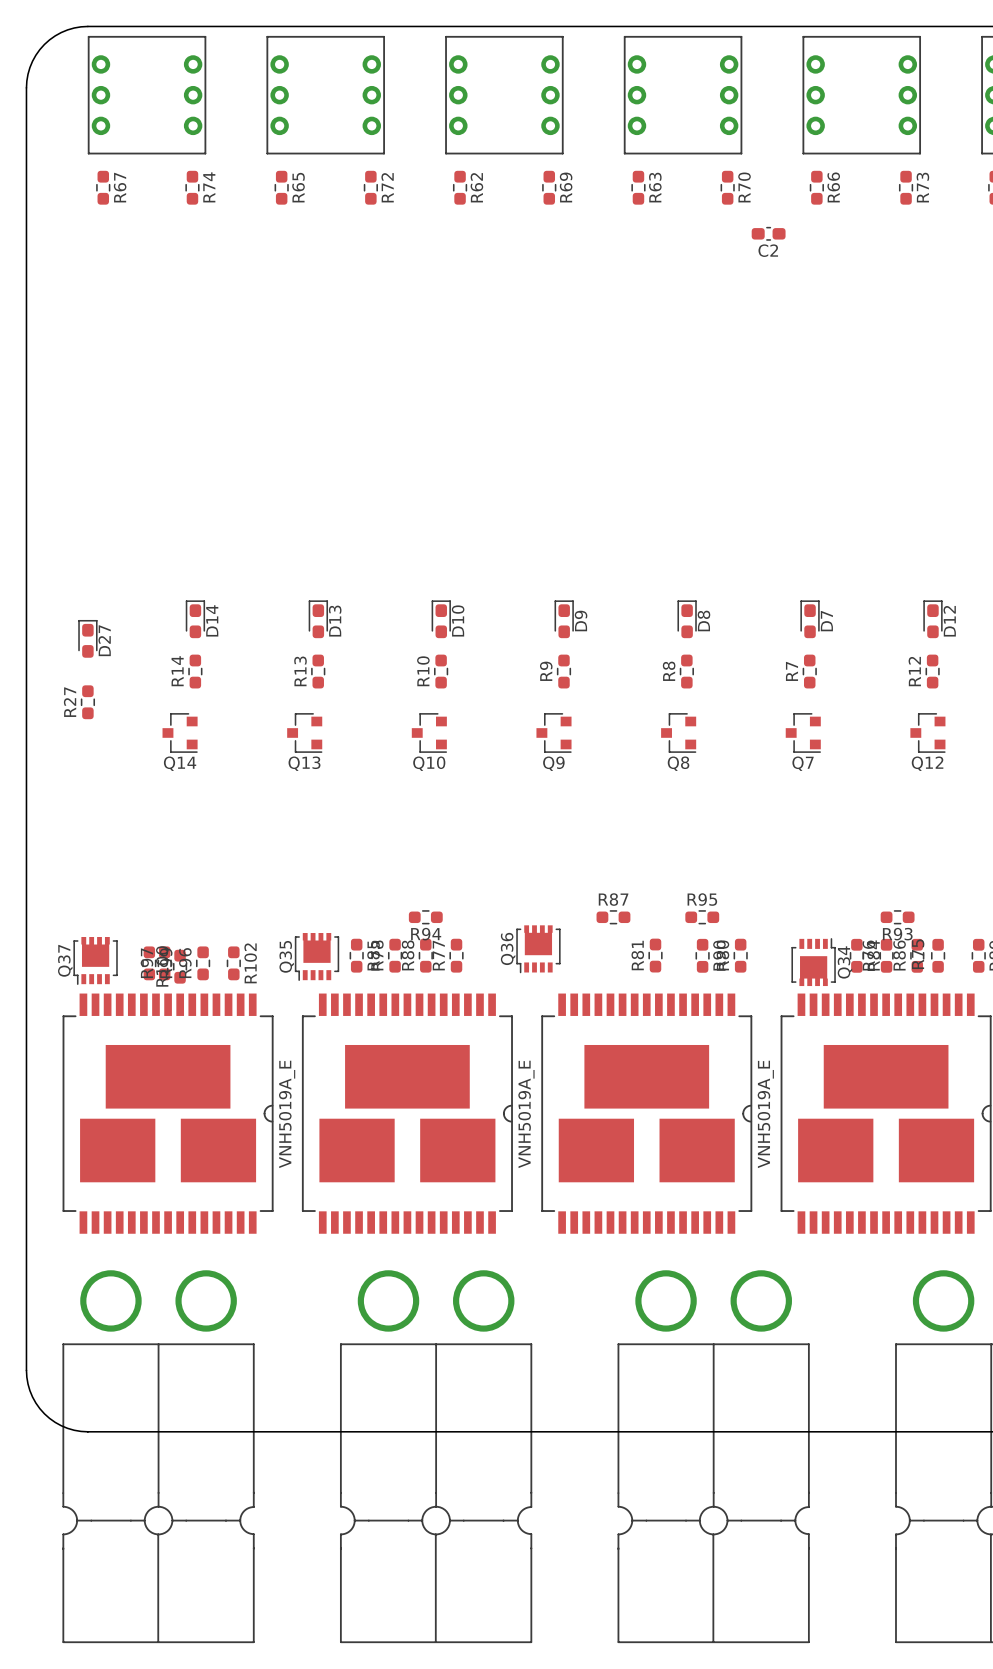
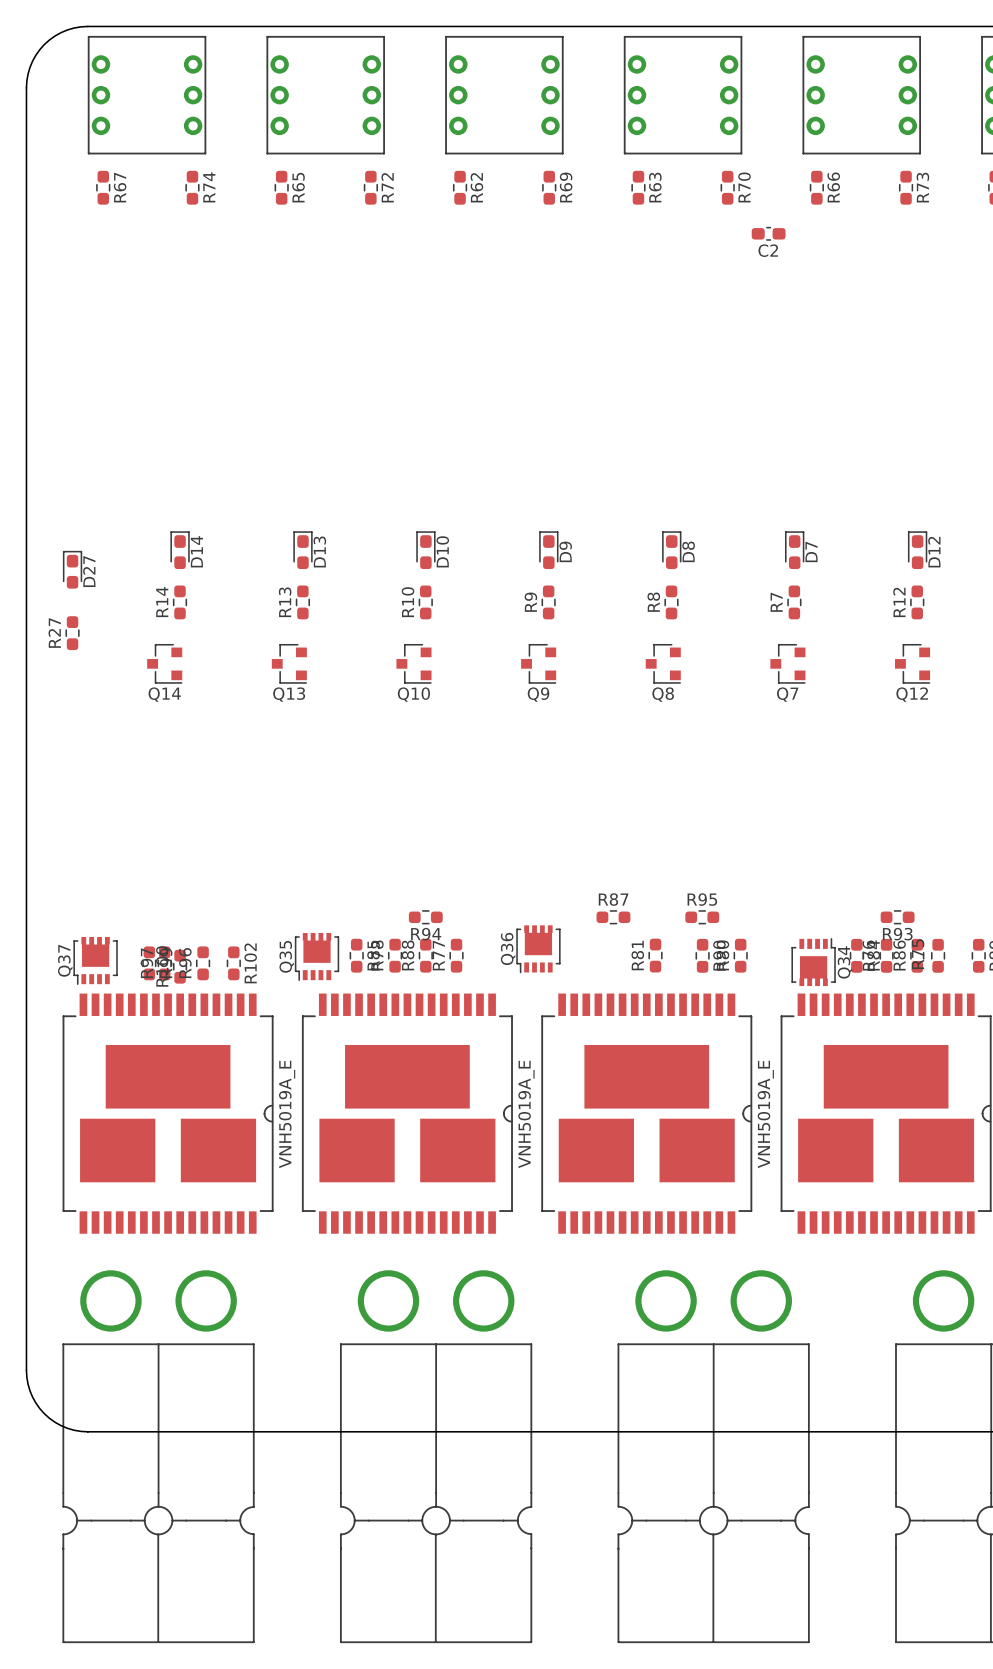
D14 position: (195, 619) -> (180, 550)
D13 position: (318, 619) -> (302, 550)
D10 position: (441, 619) -> (425, 550)
D9 position: (564, 619) -> (548, 550)
D8 position: (687, 619) -> (671, 550)
D7 position: (810, 619) -> (794, 550)
D12 position: (932, 619) -> (917, 550)
D27 position: (87, 638) -> (72, 569)
R14 position: (195, 671) -> (180, 602)
R13 position: (318, 671) -> (302, 602)
R10 position: (441, 671) -> (425, 602)
R9 position: (563, 671) -> (548, 602)
R8 position: (686, 671) -> (671, 602)
R7 position: (809, 671) -> (794, 602)
R12 position: (932, 671) -> (917, 602)
R27 position: (87, 702) -> (72, 633)
Q14 position: (180, 732) -> (164, 663)
Q13 position: (304, 732) -> (289, 663)
Q10 position: (429, 732) -> (414, 663)
Q9 position: (554, 732) -> (538, 663)
Q8 position: (678, 732) -> (663, 663)
Q7 position: (803, 732) -> (787, 663)
Q12 position: (927, 732) -> (912, 663)

